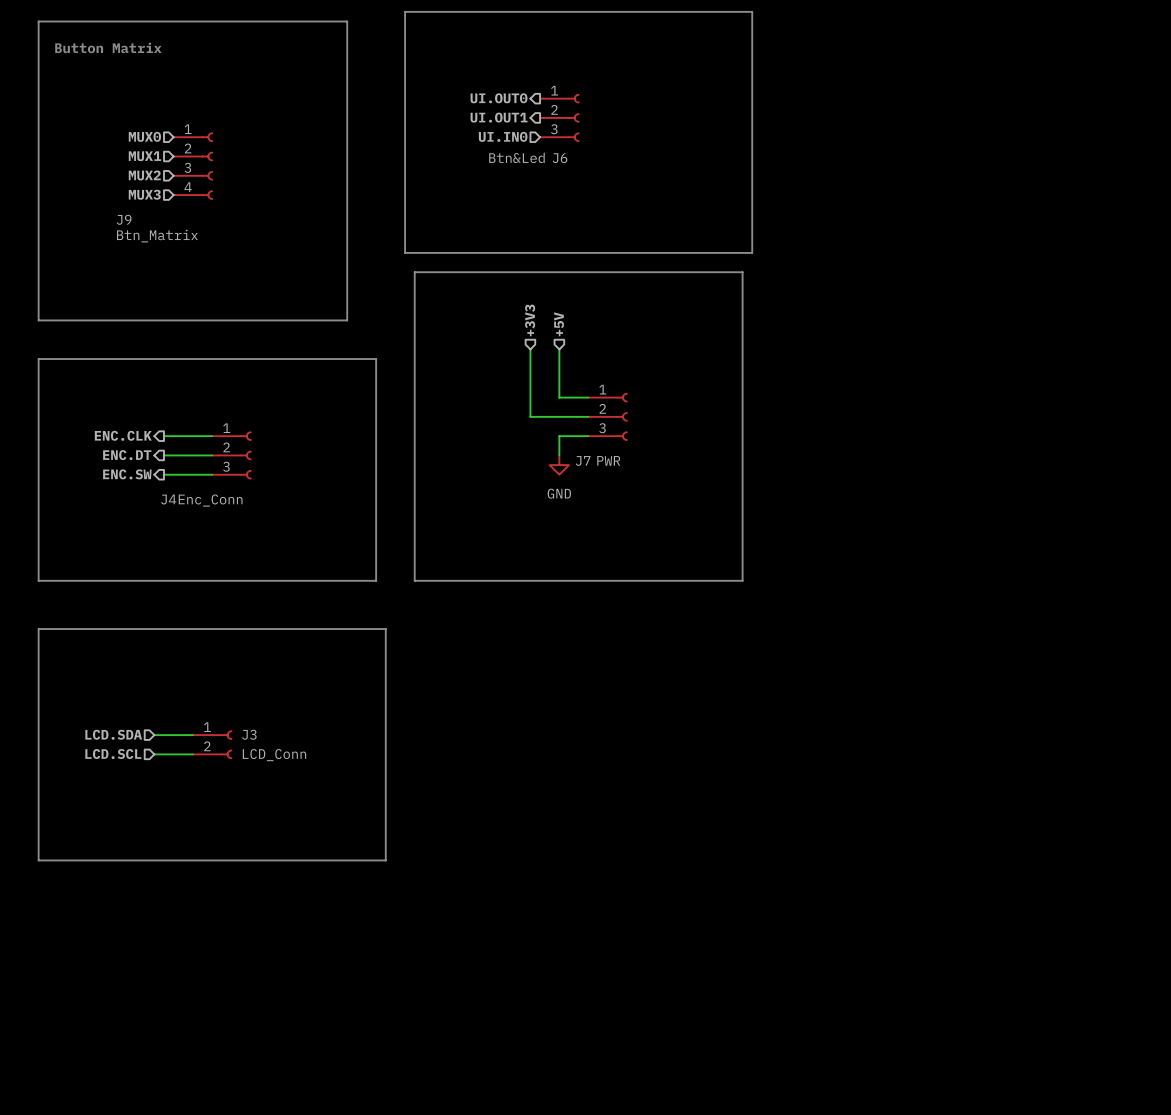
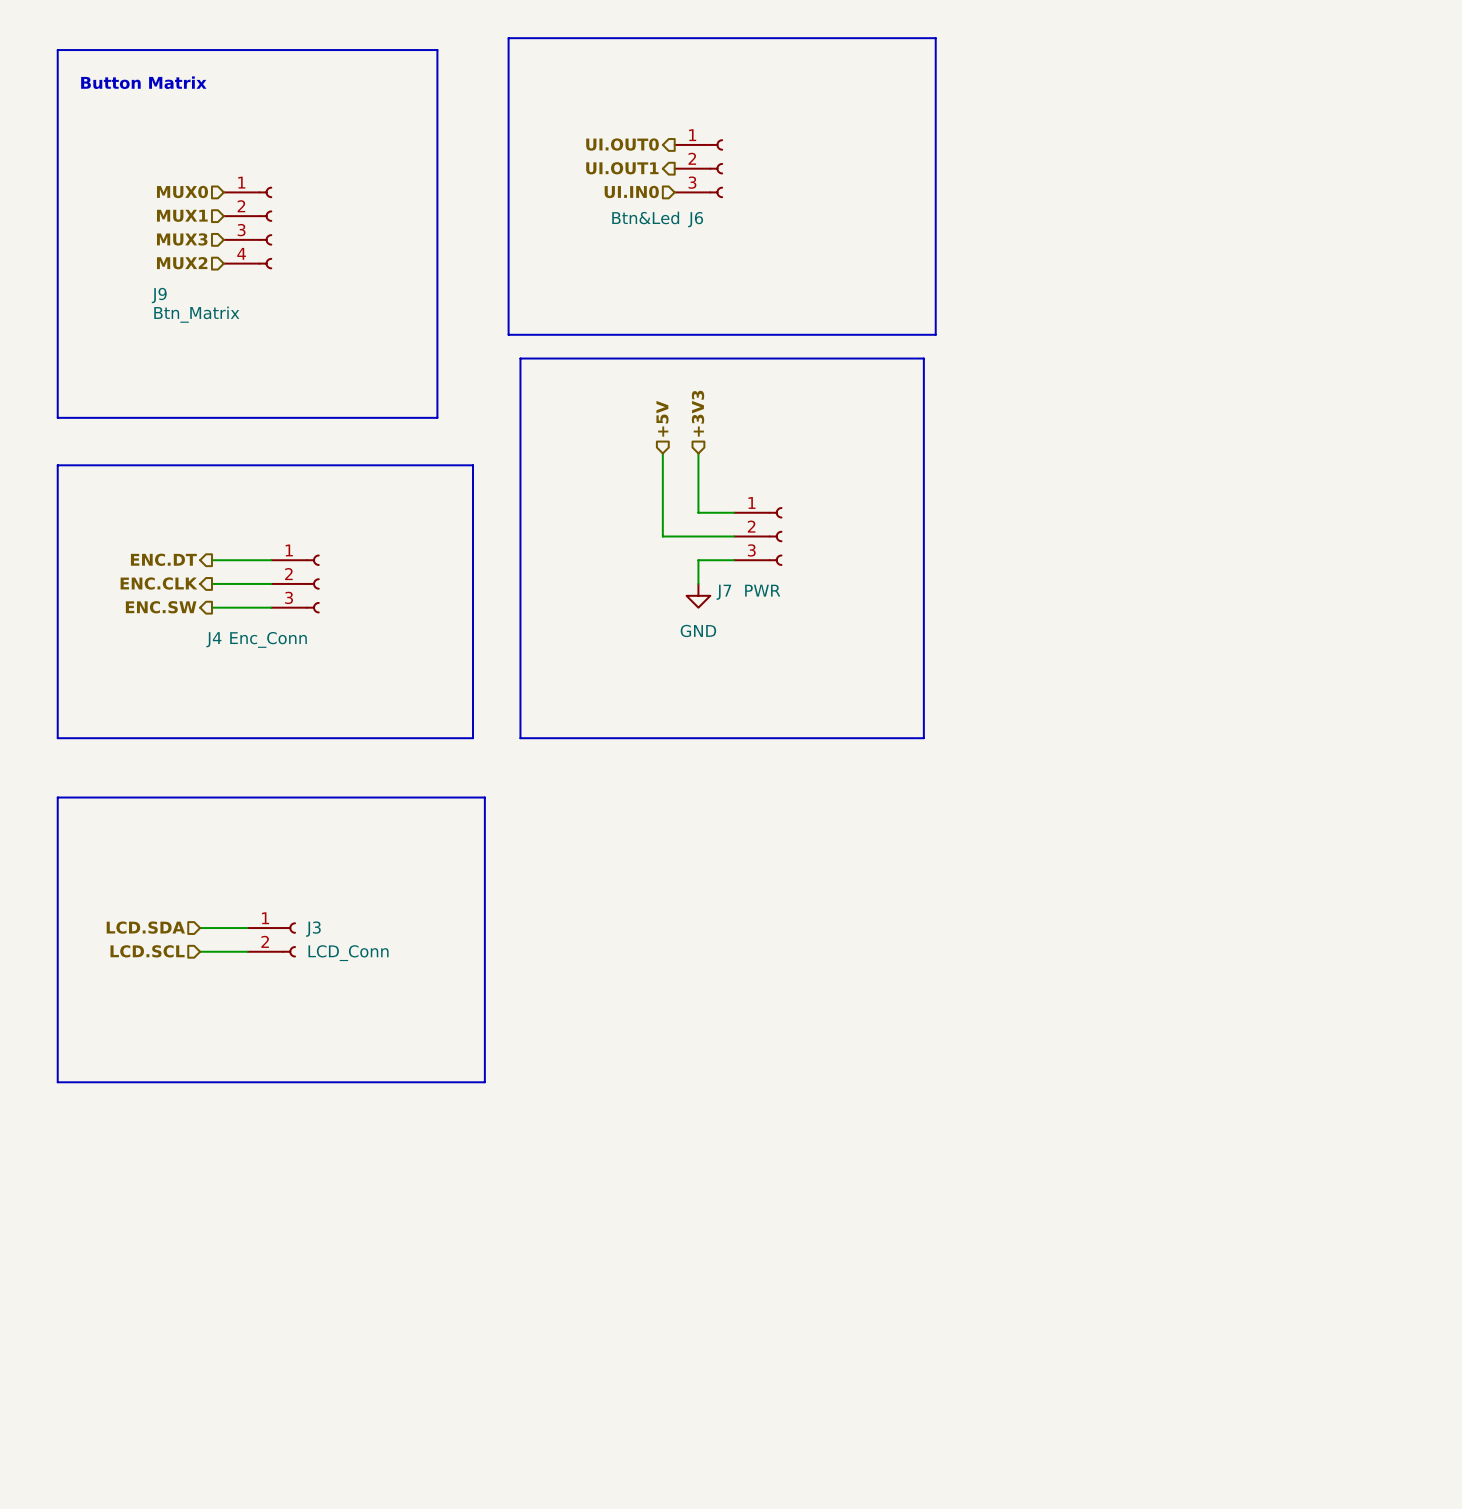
hierarchical label: MUX2 (144, 175) -> MUX3 (182, 239)
hierarchical label: MUX3 (144, 194) -> MUX2 (182, 263)
hierarchical label: +3V3 (530, 320) -> +5V (662, 418)
hierarchical label: +5V (559, 324) -> +3V3 (698, 413)
hierarchical label: ENC.CLK (123, 435) -> ENC.DT (163, 559)
hierarchical label: ENC.DT (127, 455) -> ENC.CLK (159, 583)

